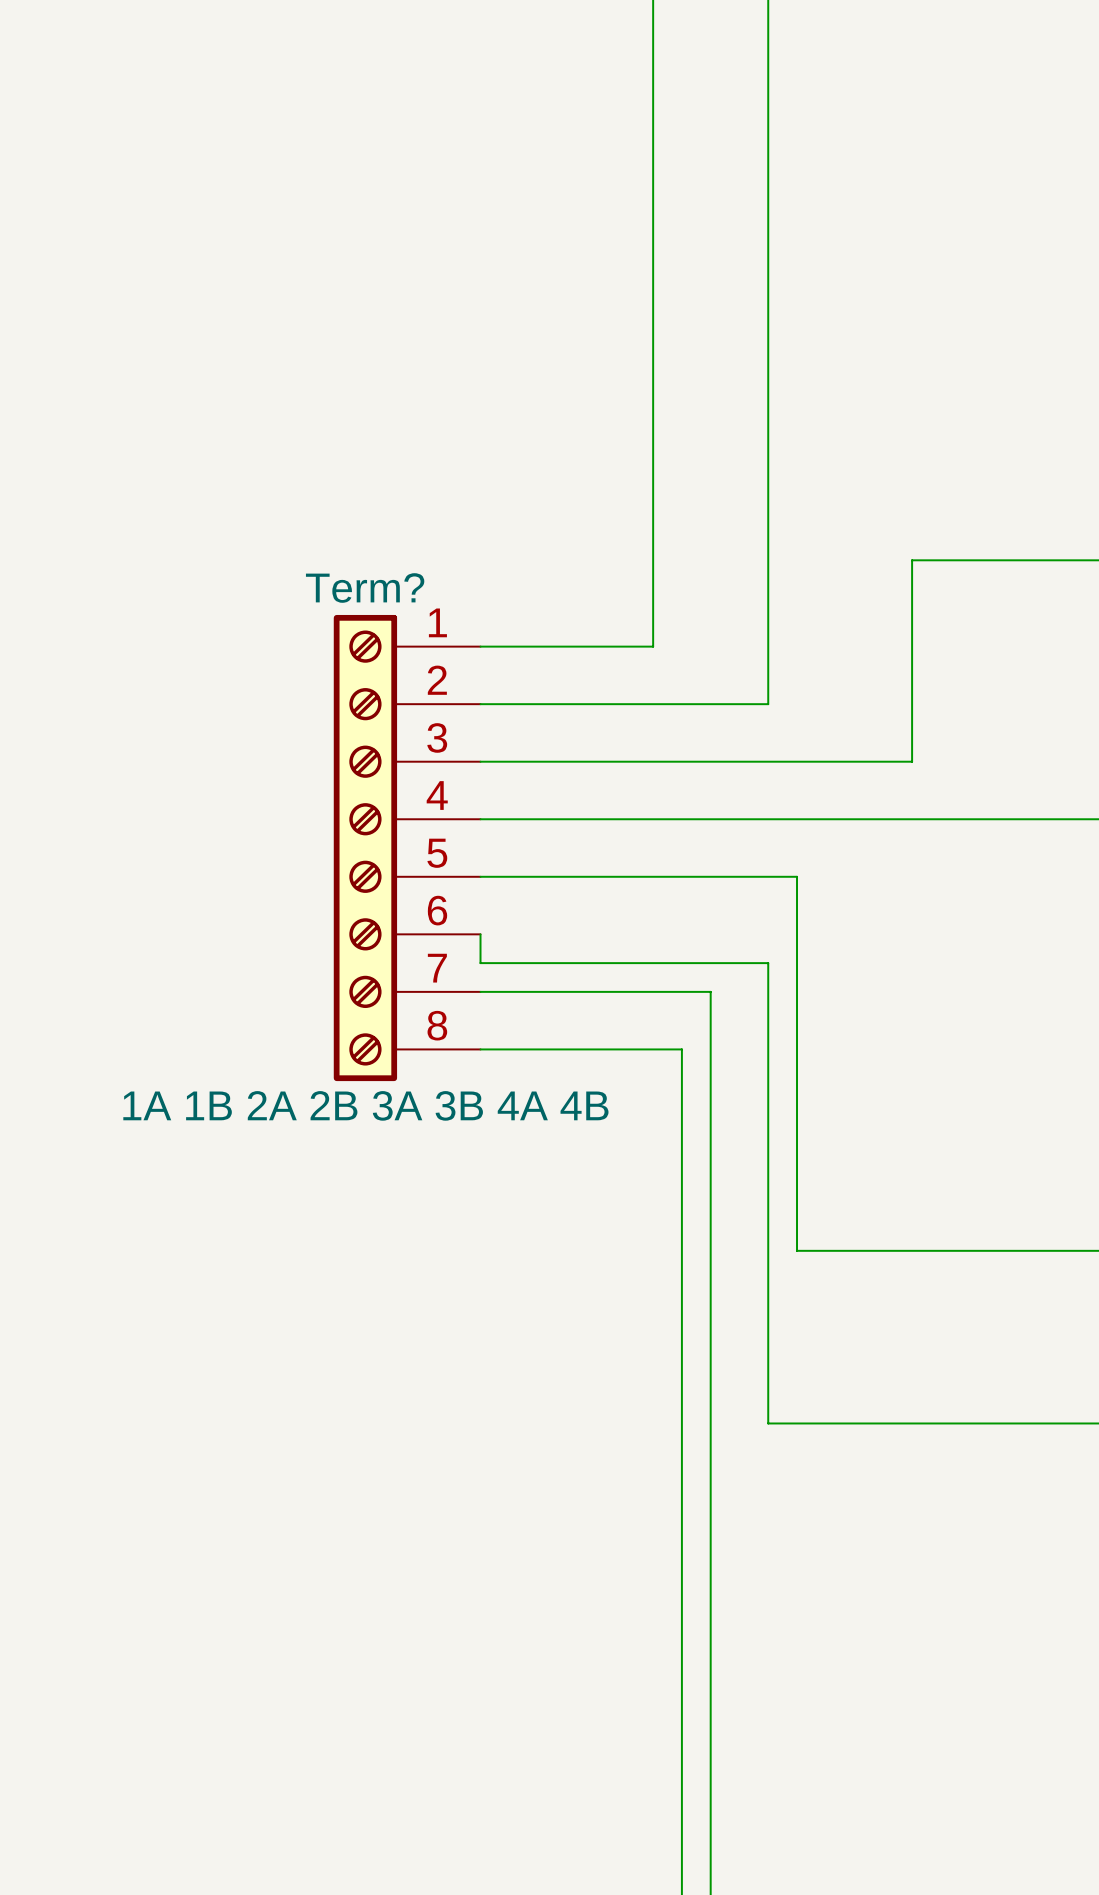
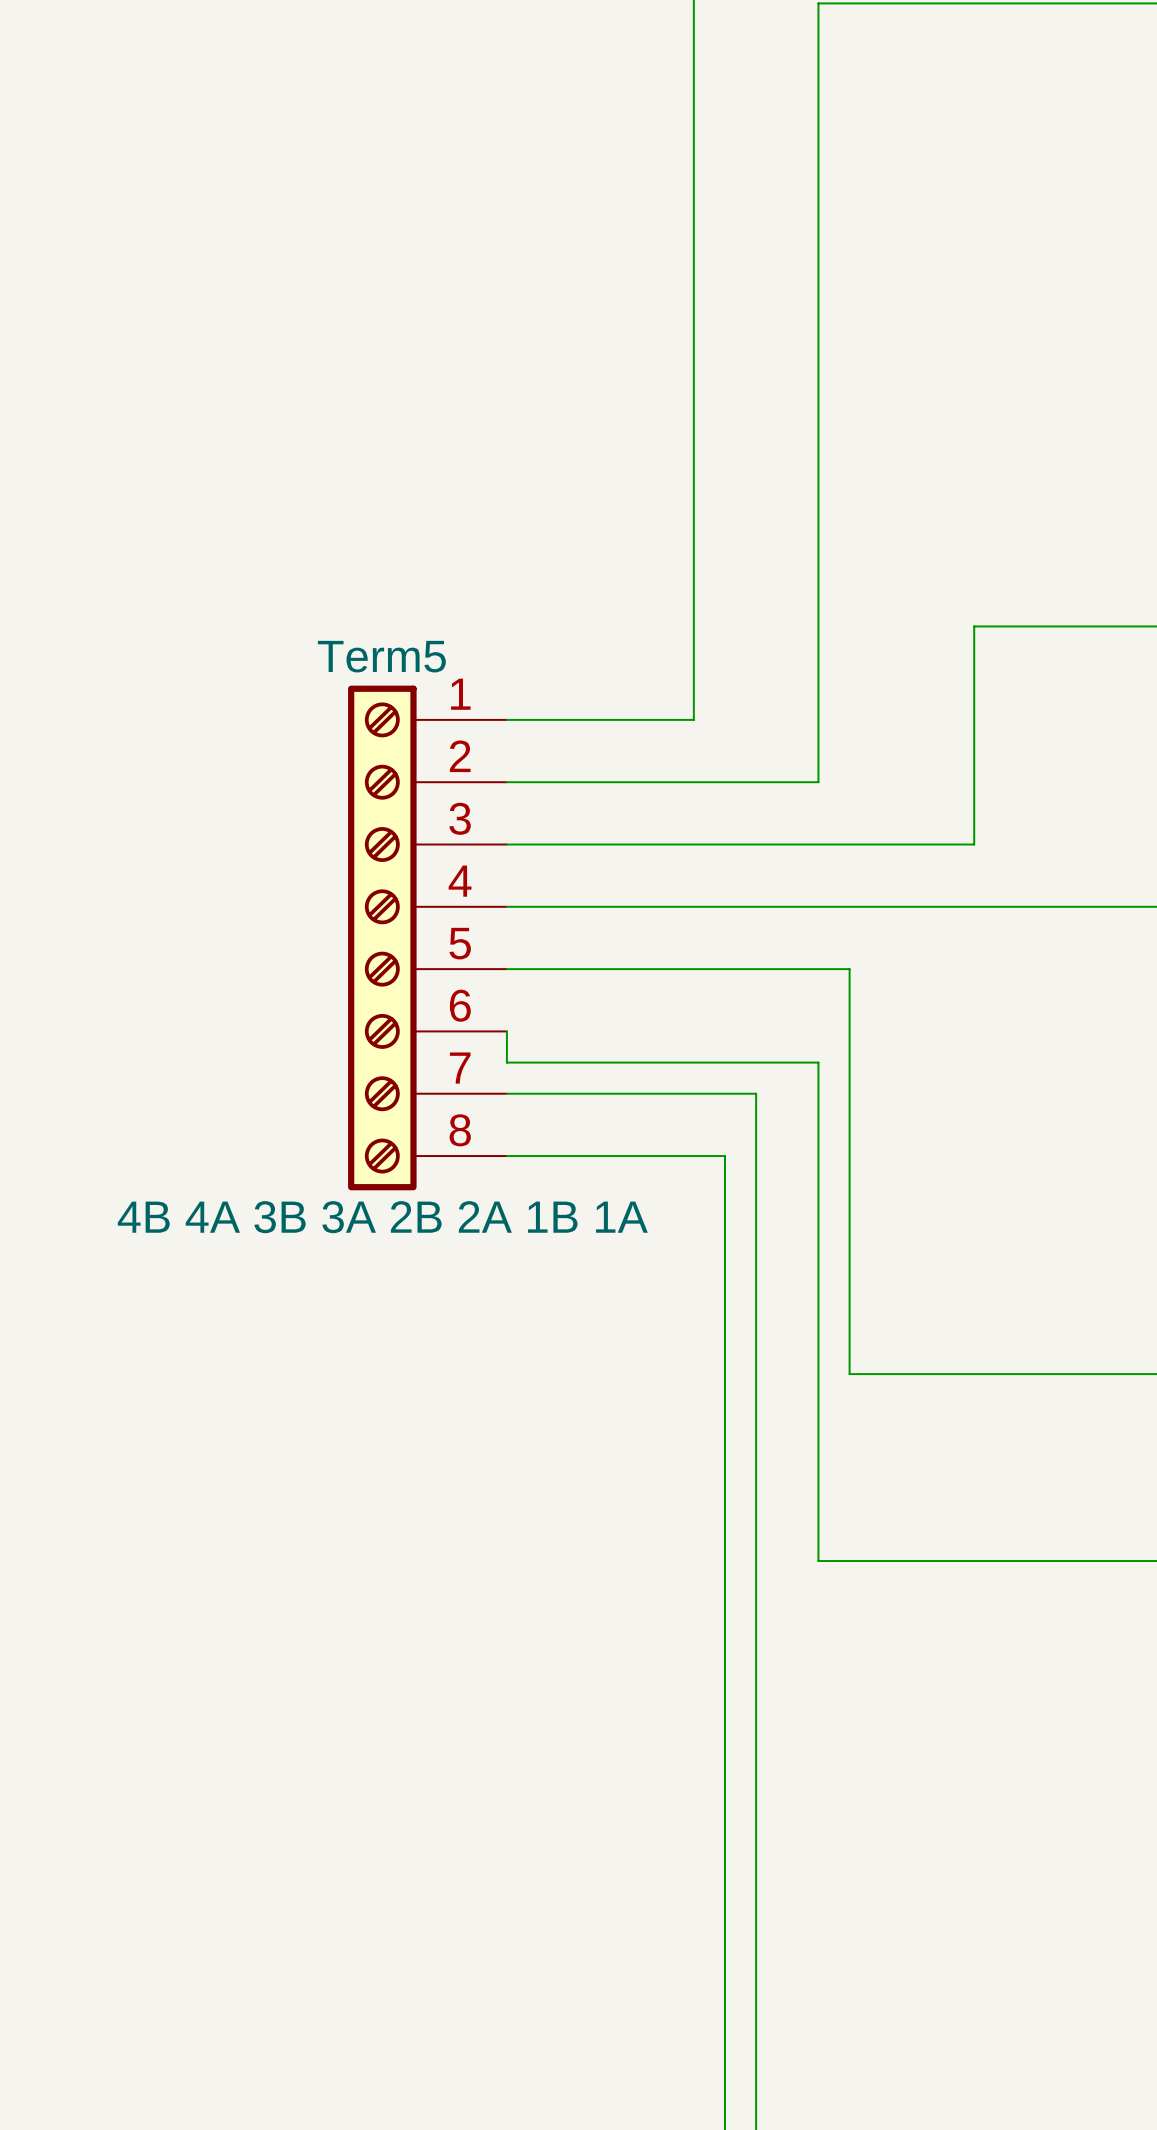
Term? name: Term? (365, 587) -> Term5 (381, 656)
Term? value: 1A 1B 2A 2B 3A 3B 4A 4B (365, 1105) -> 4B 4A 3B 3A 2B 2A 1B 1A (382, 1217)

